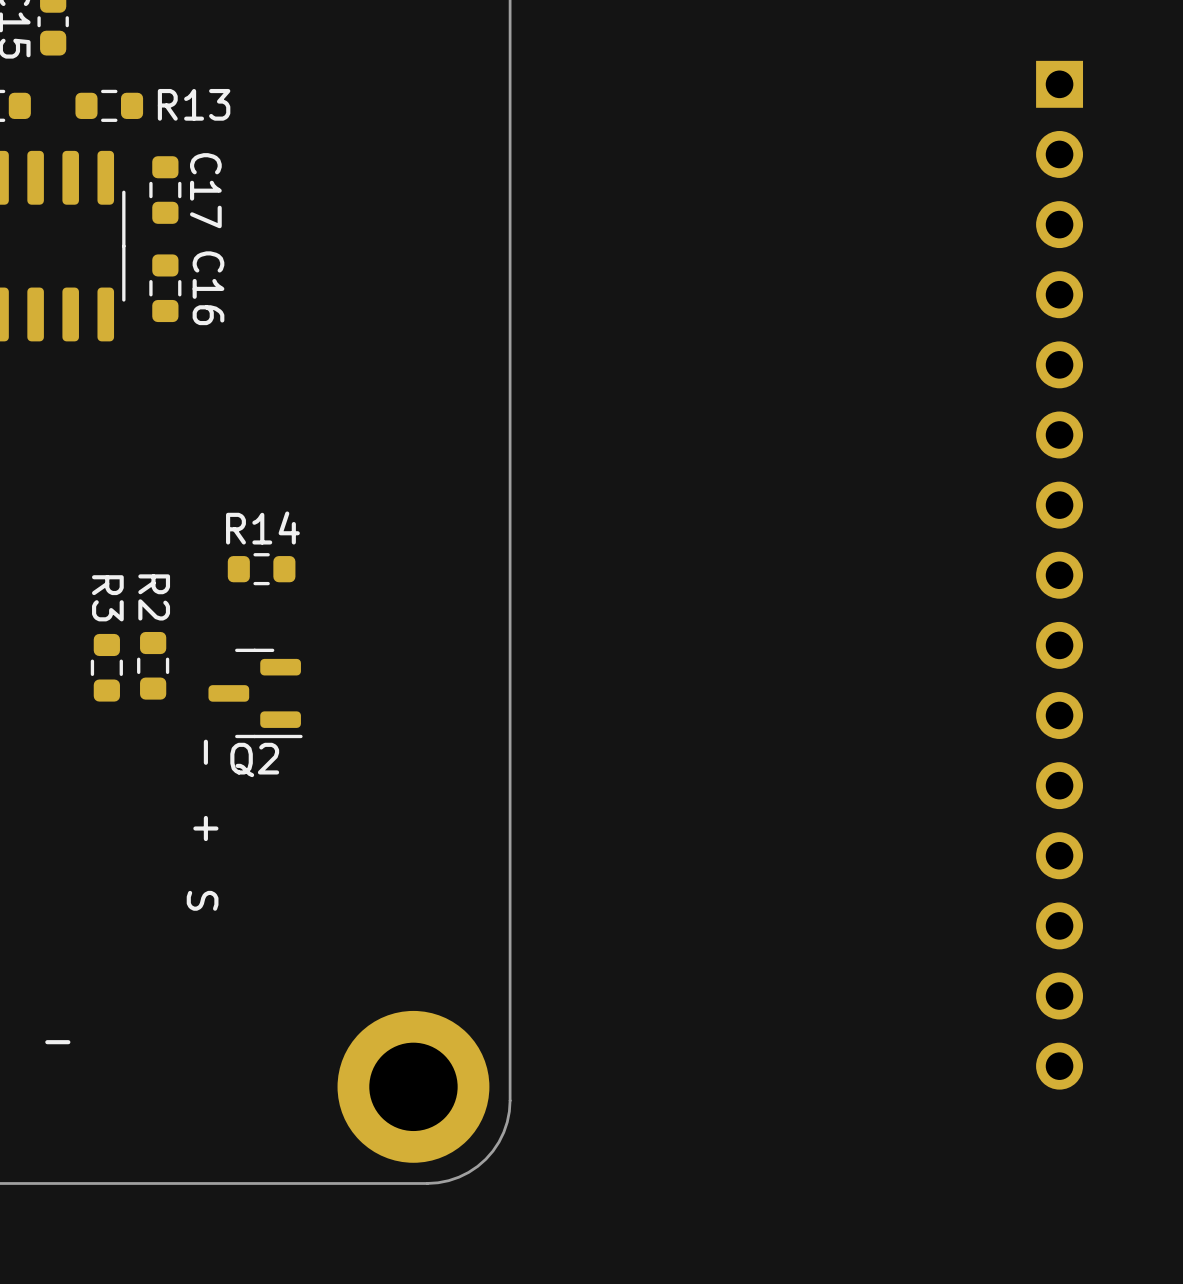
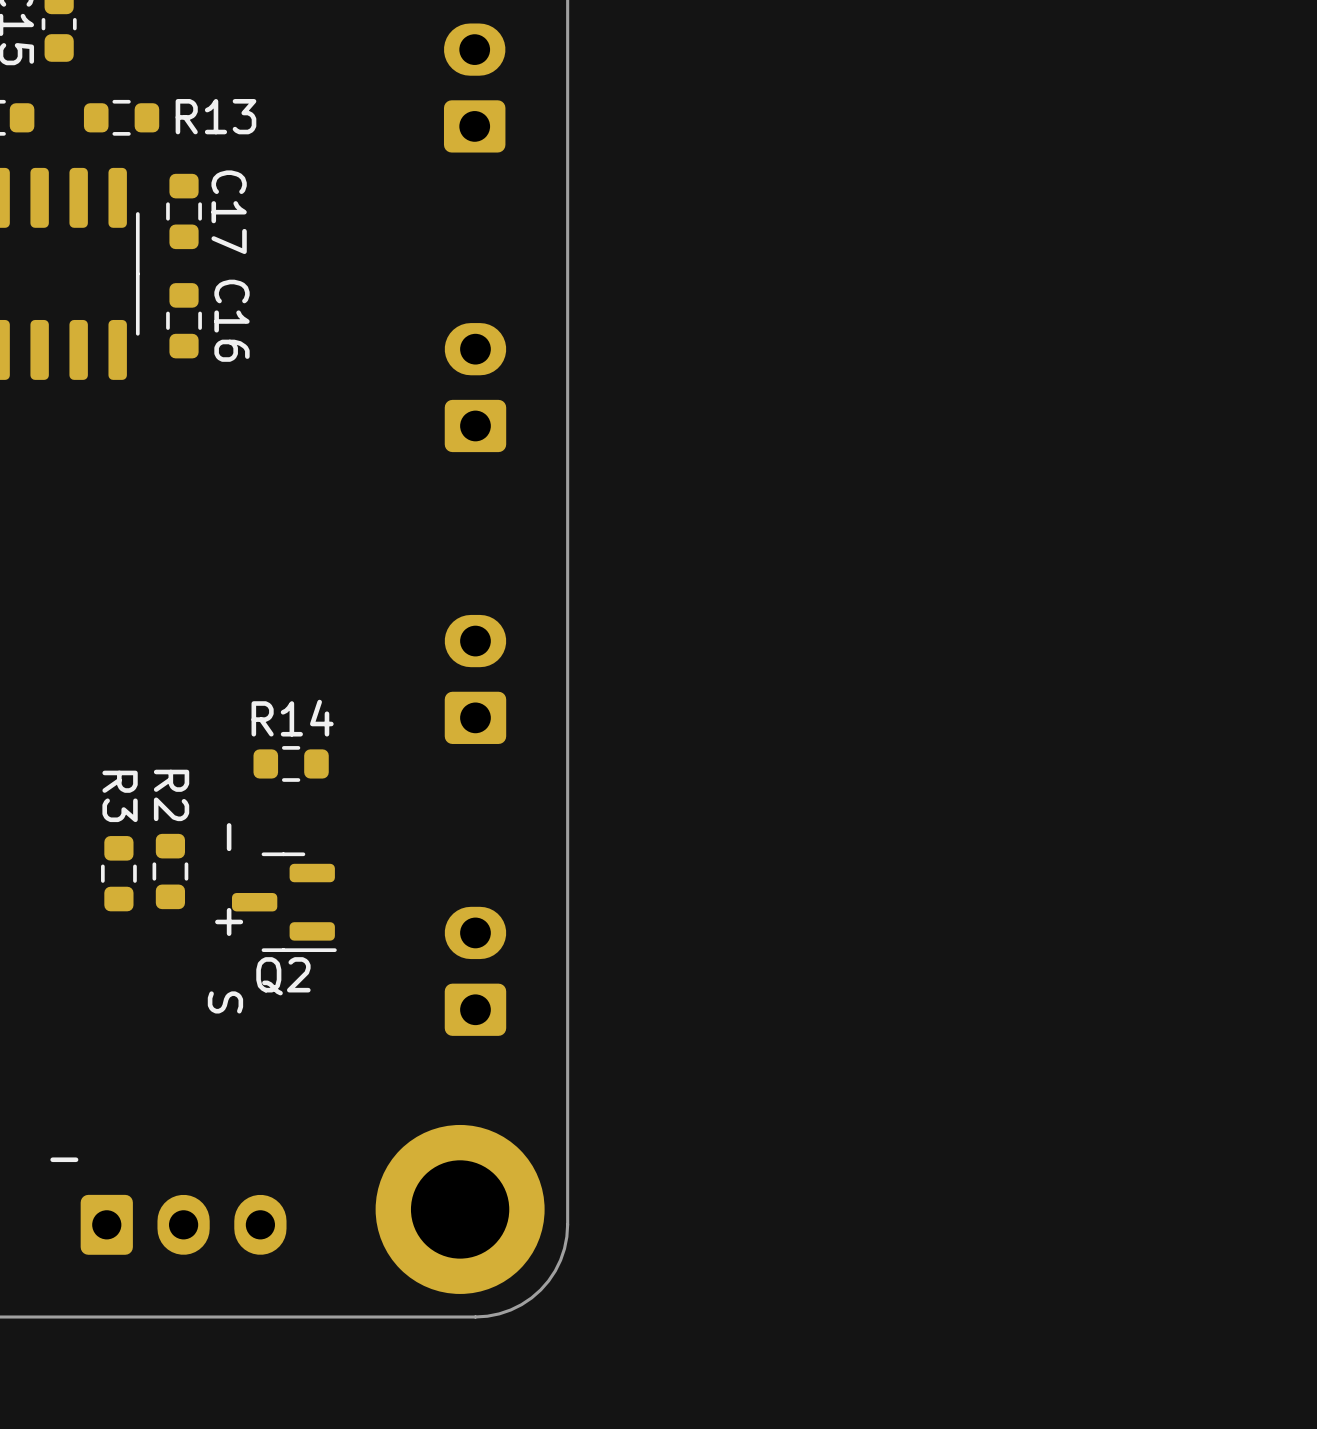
part: none -> (474, 88)
part: none -> (475, 387)
R14 position: (261, 569) -> (291, 763)
part: (1059, 575) -> none
part: none -> (475, 679)
R2 position: (153, 665) -> (170, 871)
R3 position: (106, 667) -> (118, 873)
Q2 position: (255, 693) -> (284, 902)
part: none -> (475, 971)
part: none -> (183, 1224)

